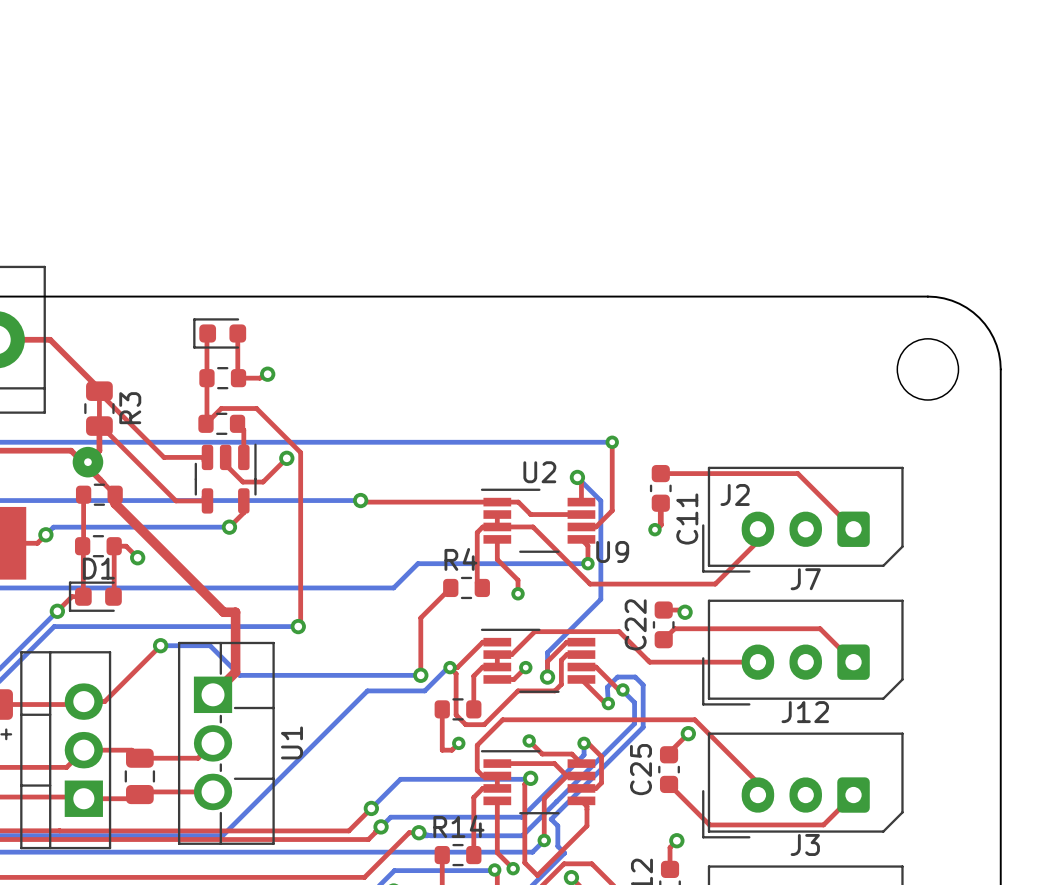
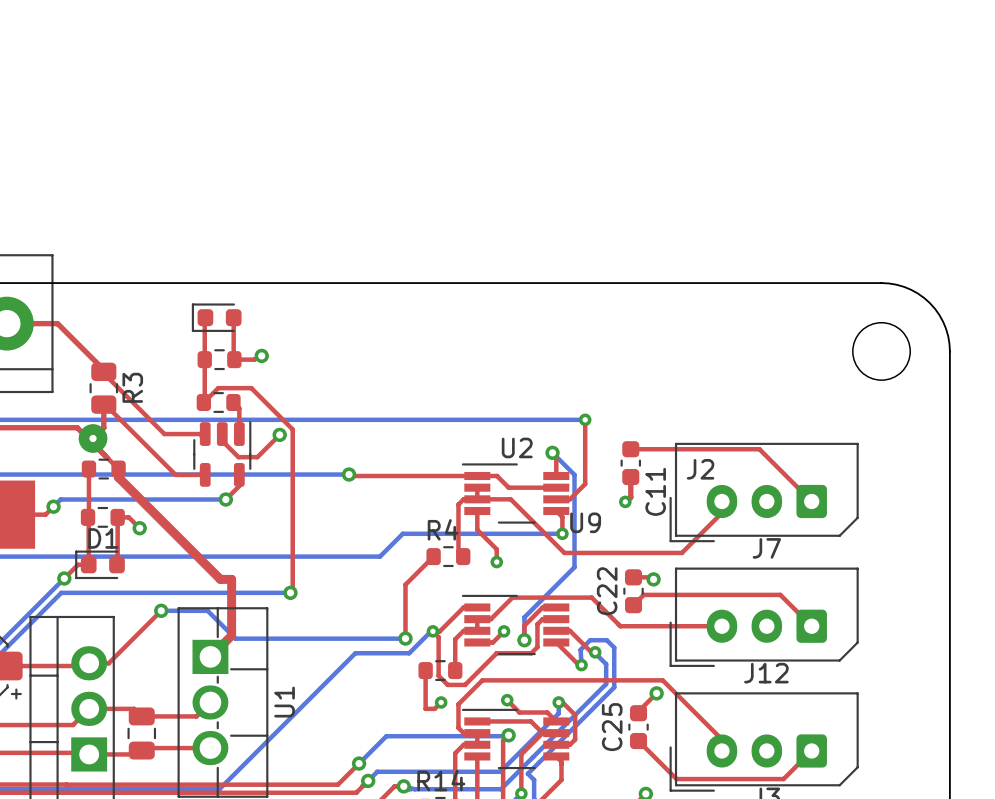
top track: (99, 392) (99, 424) -> none

